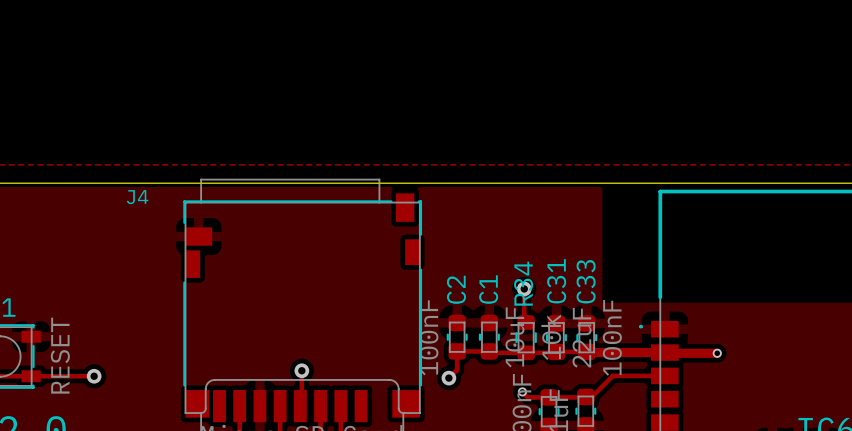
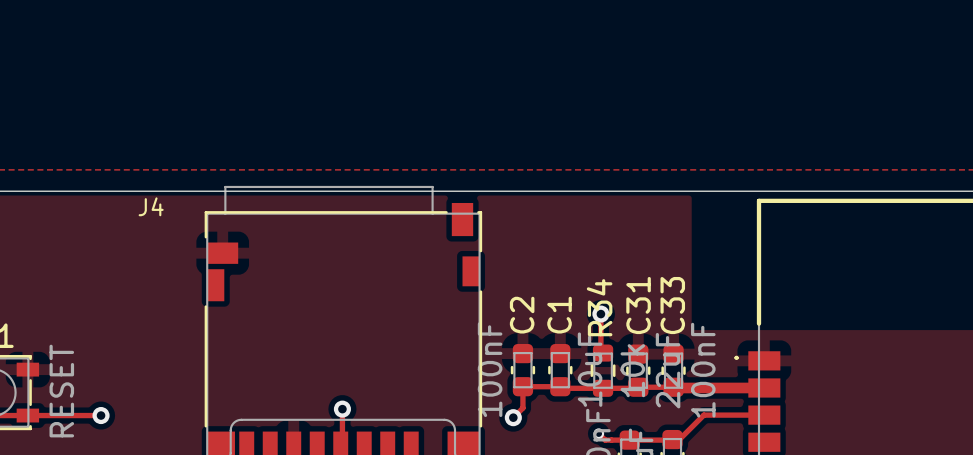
track: (664, 352) (717, 353) -> none
via: (717, 353) -> none

